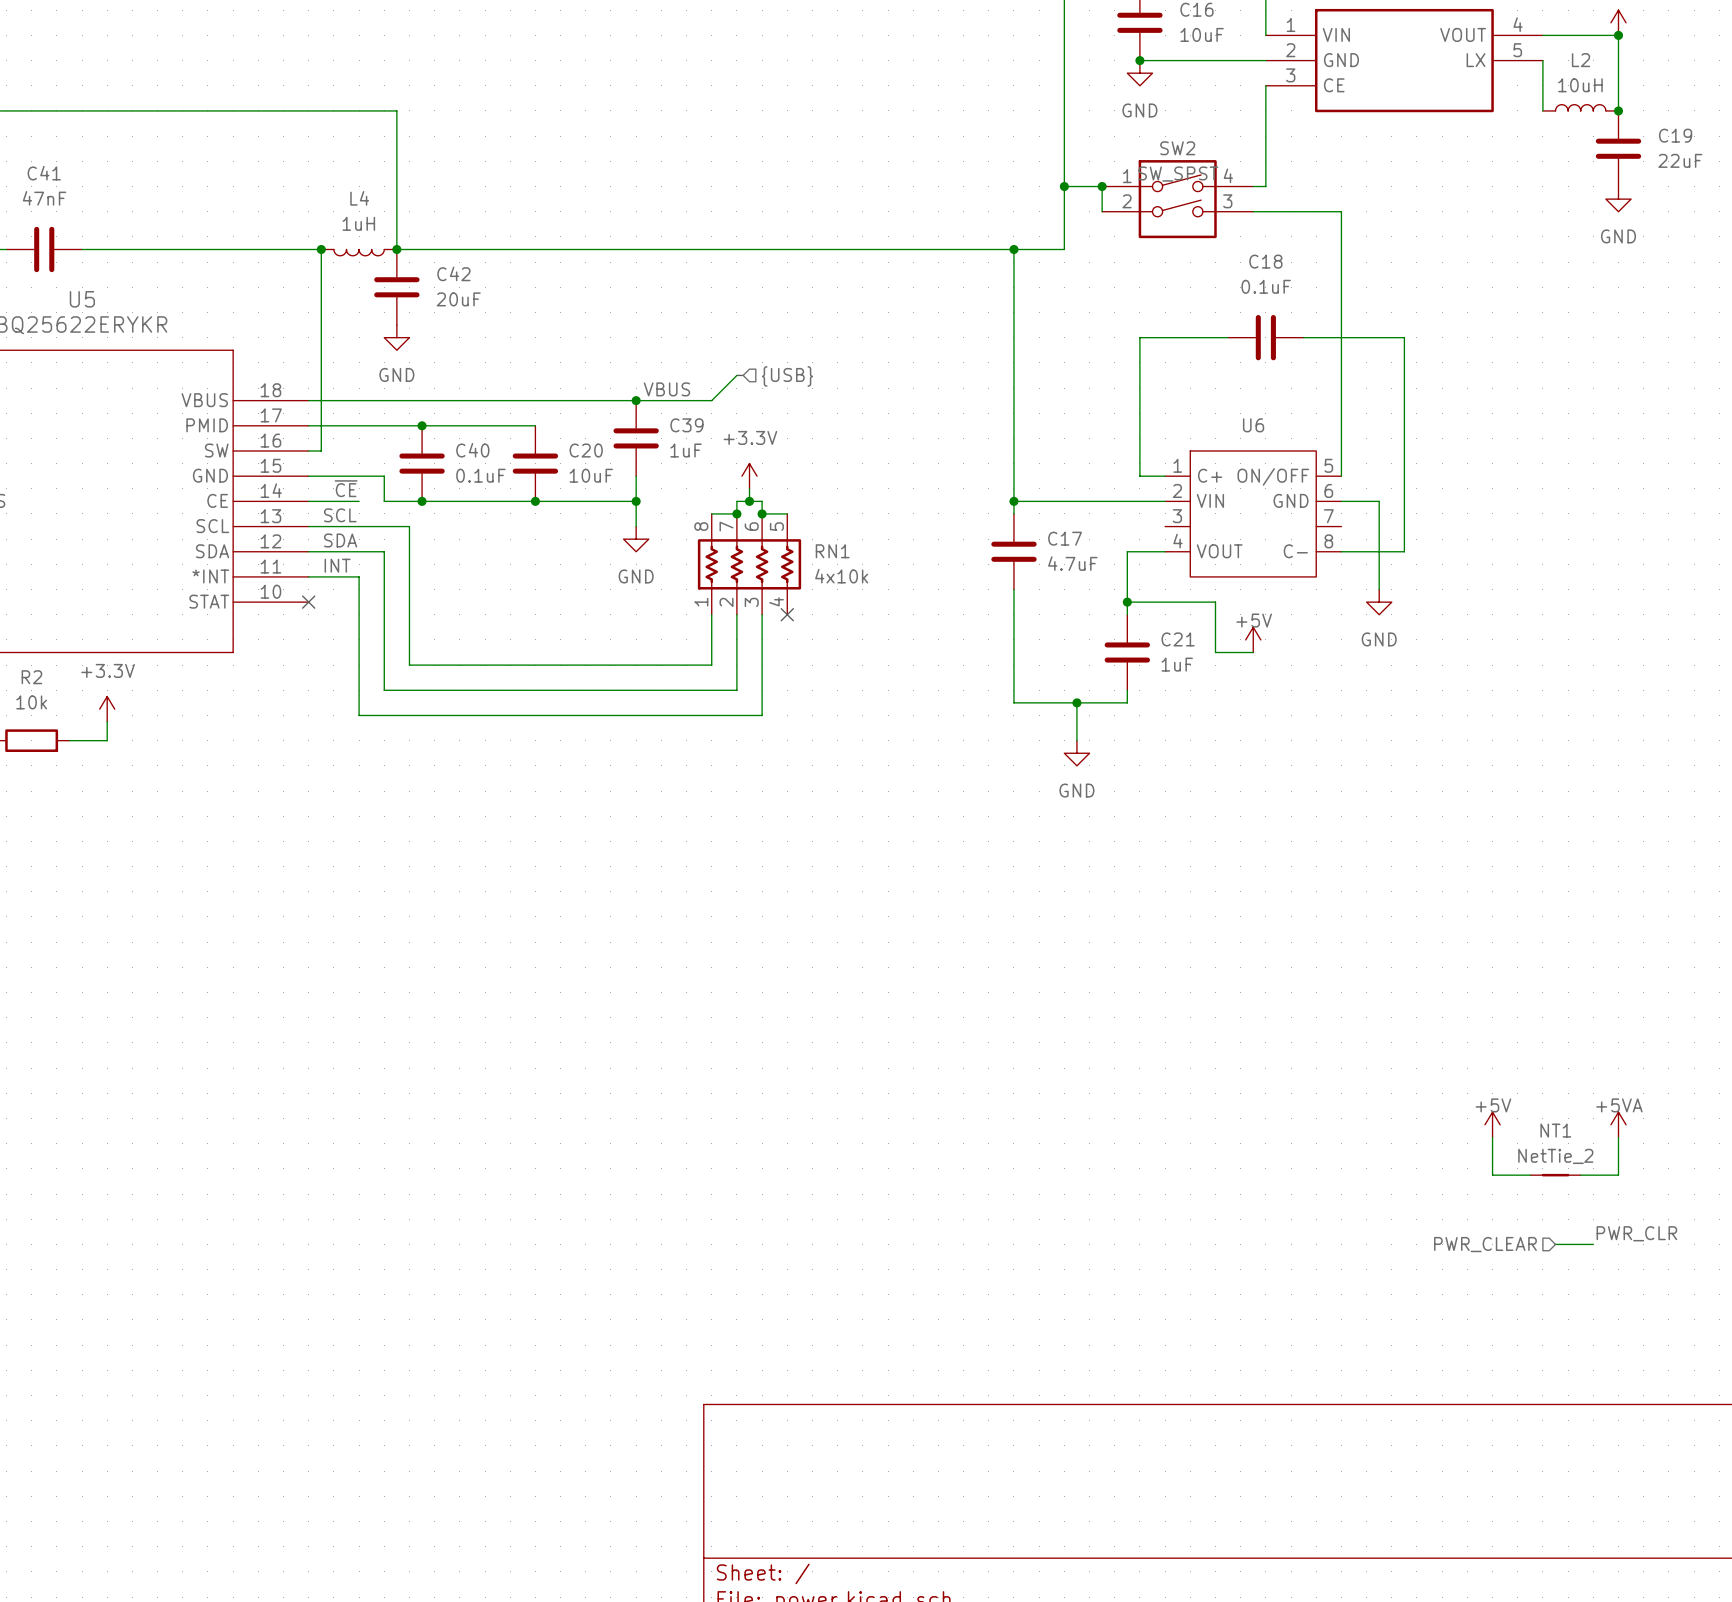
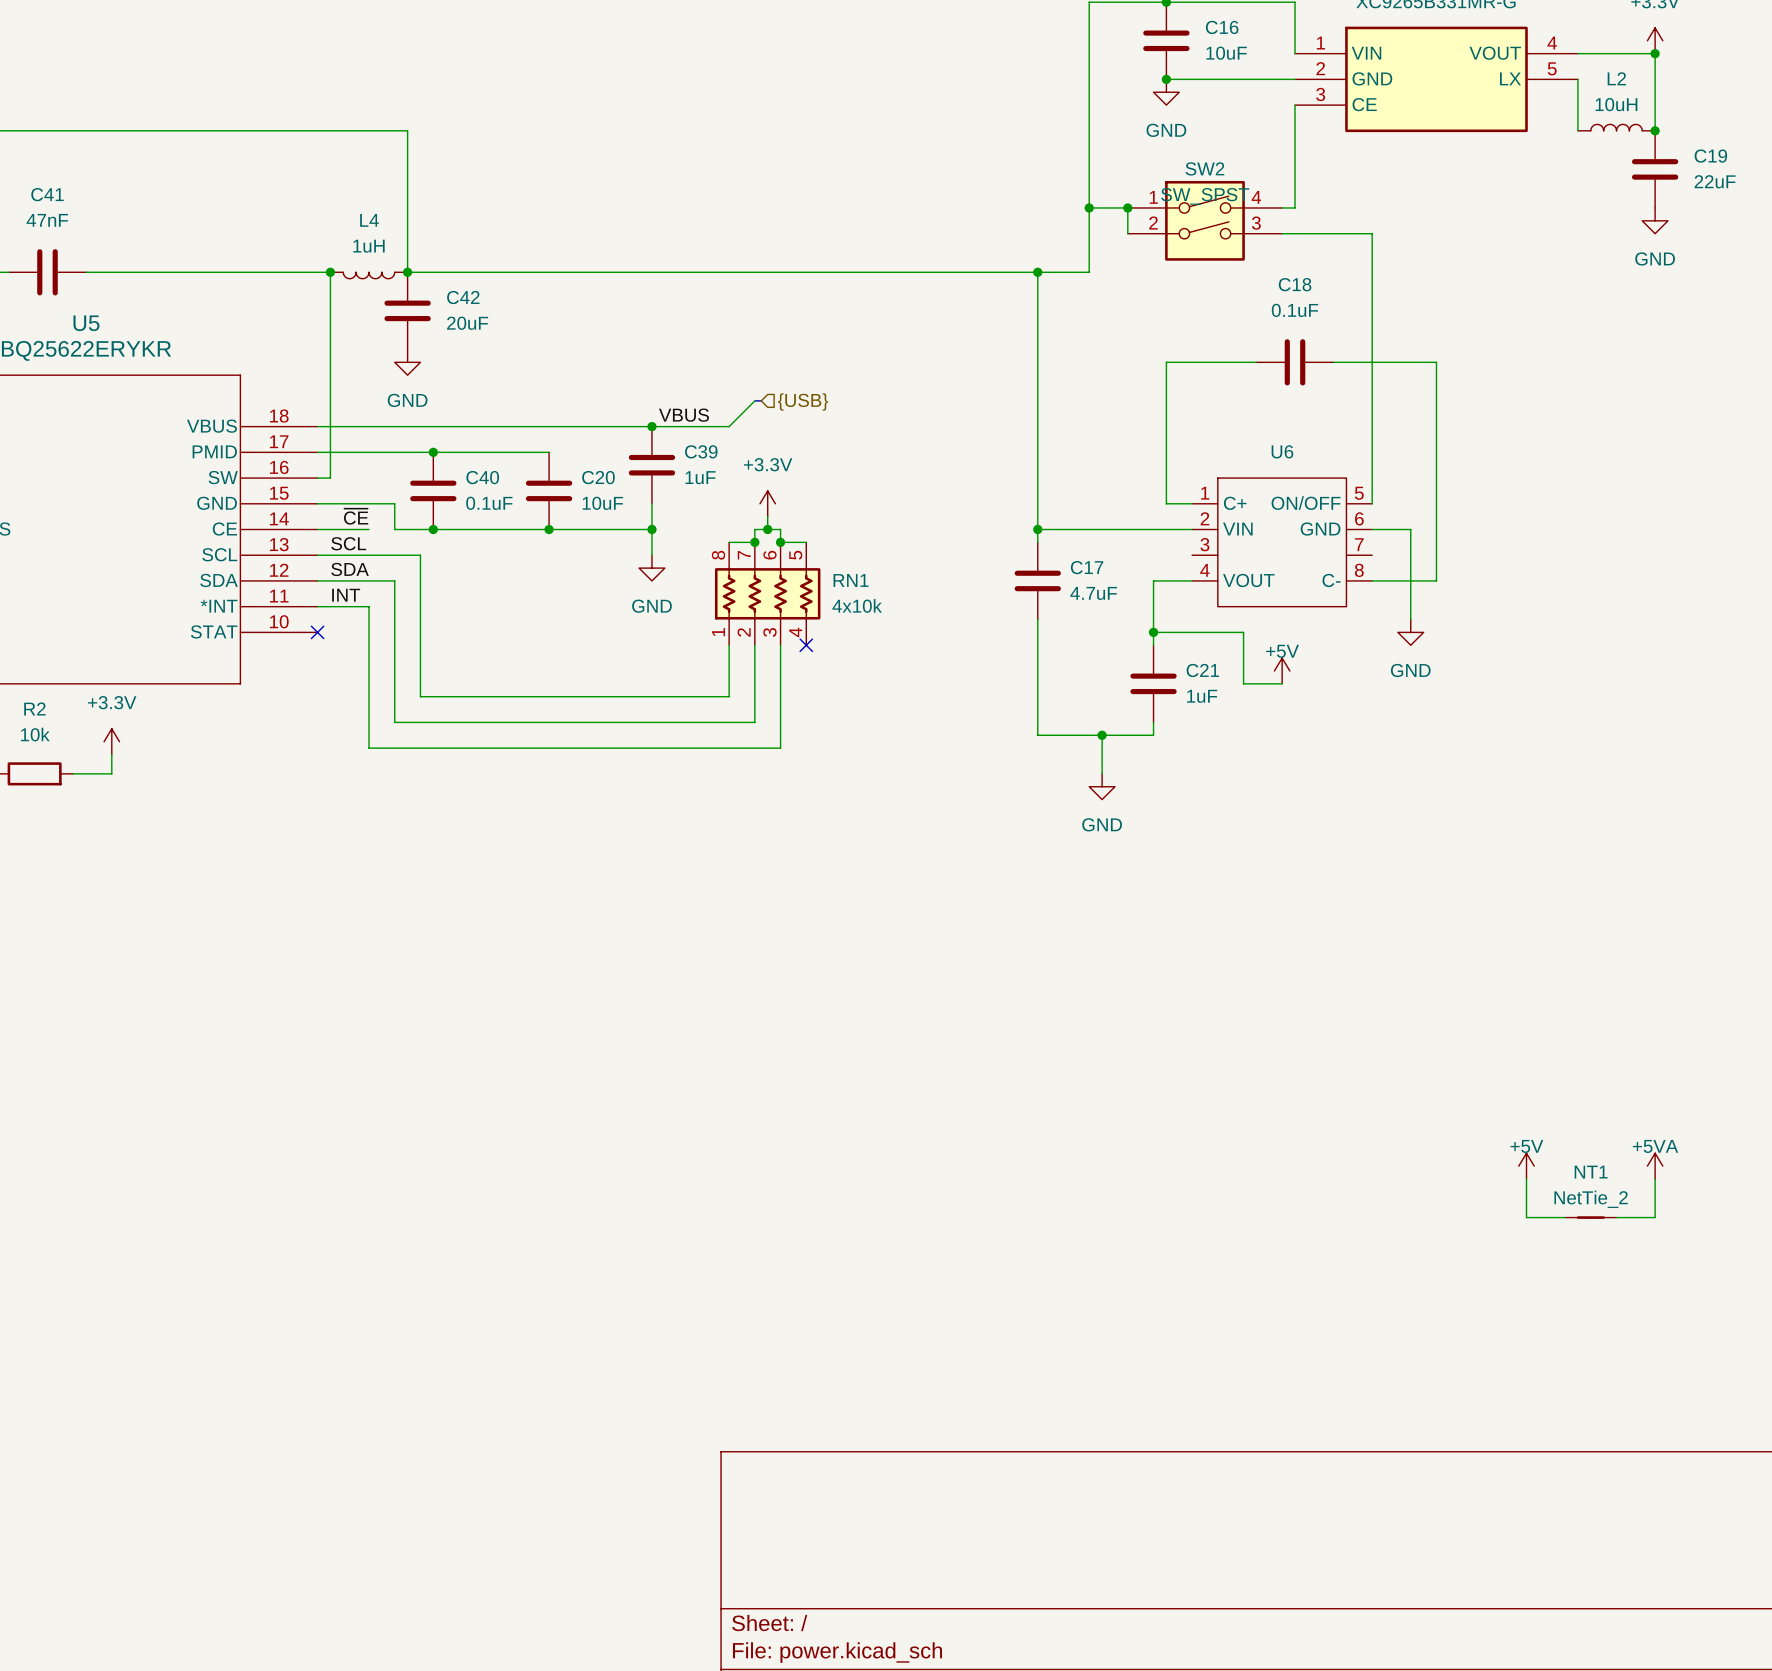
label: PWR_CLR (1636, 1233) -> none
hierarchical label: PWR_CLEAR (1485, 1244) -> none
wire: (1555, 1244) (1593, 1244) -> none

